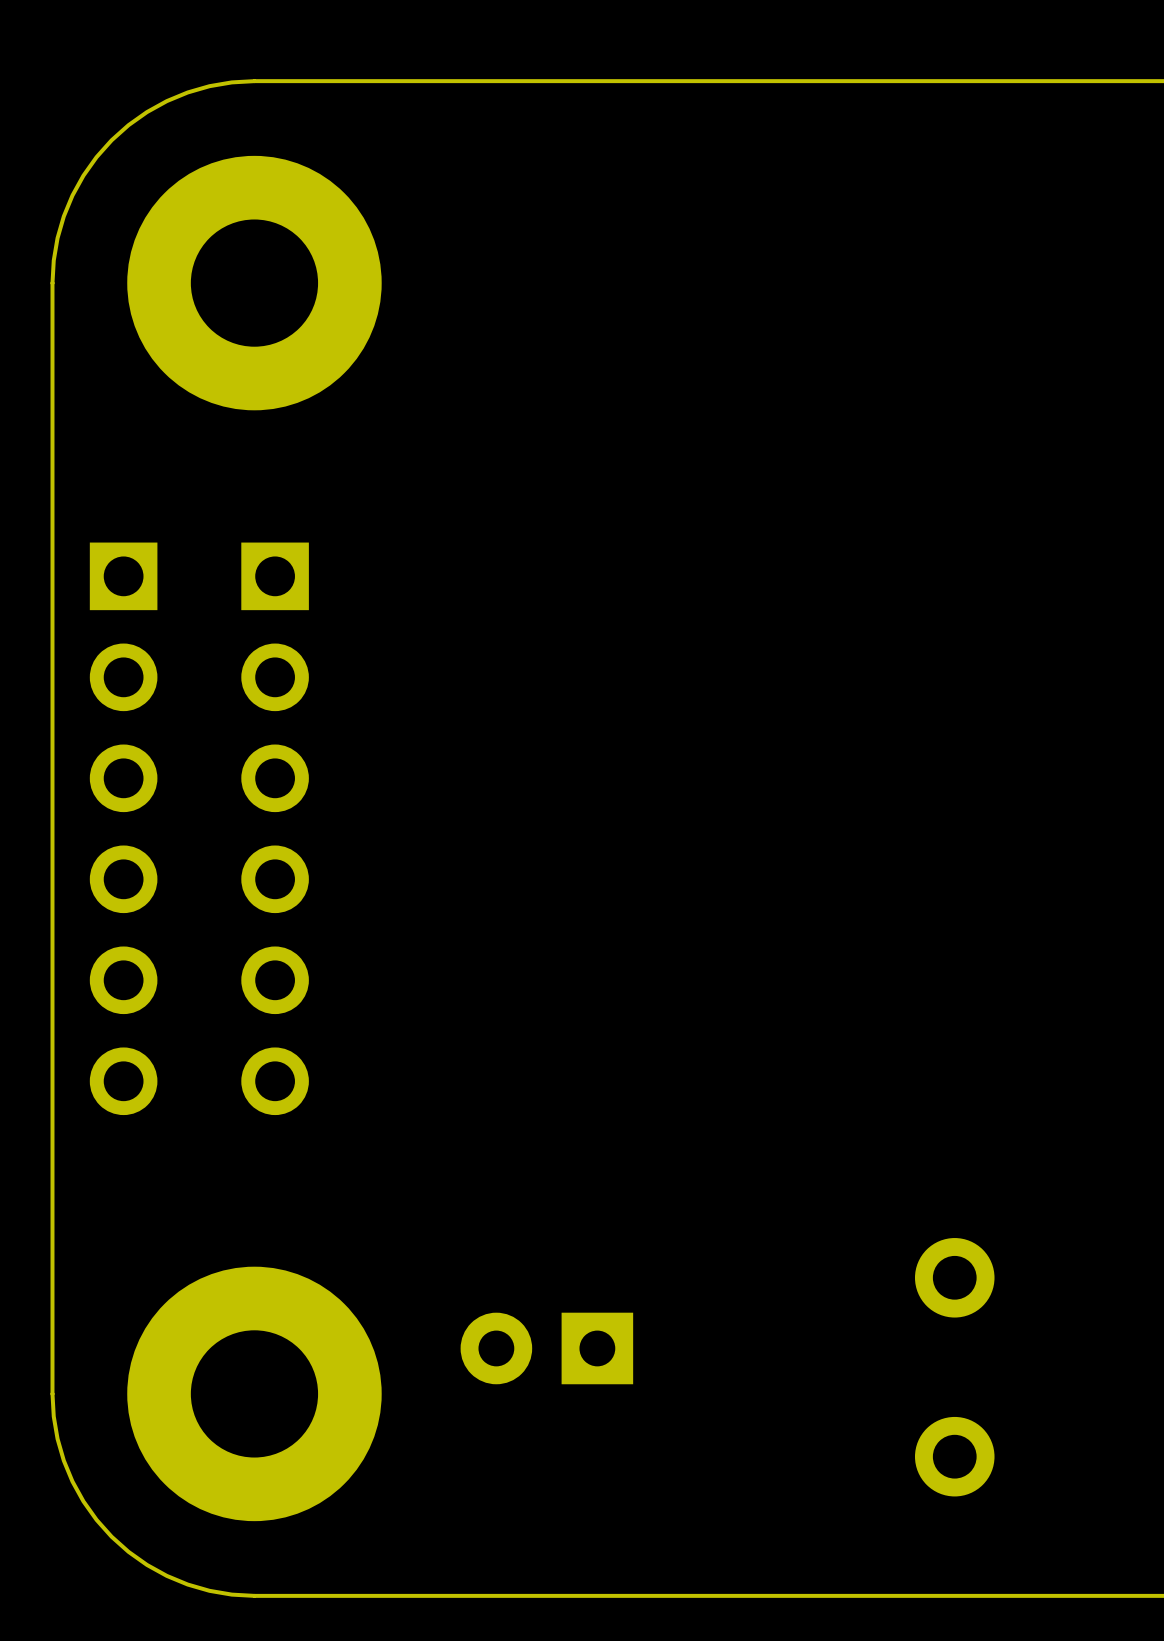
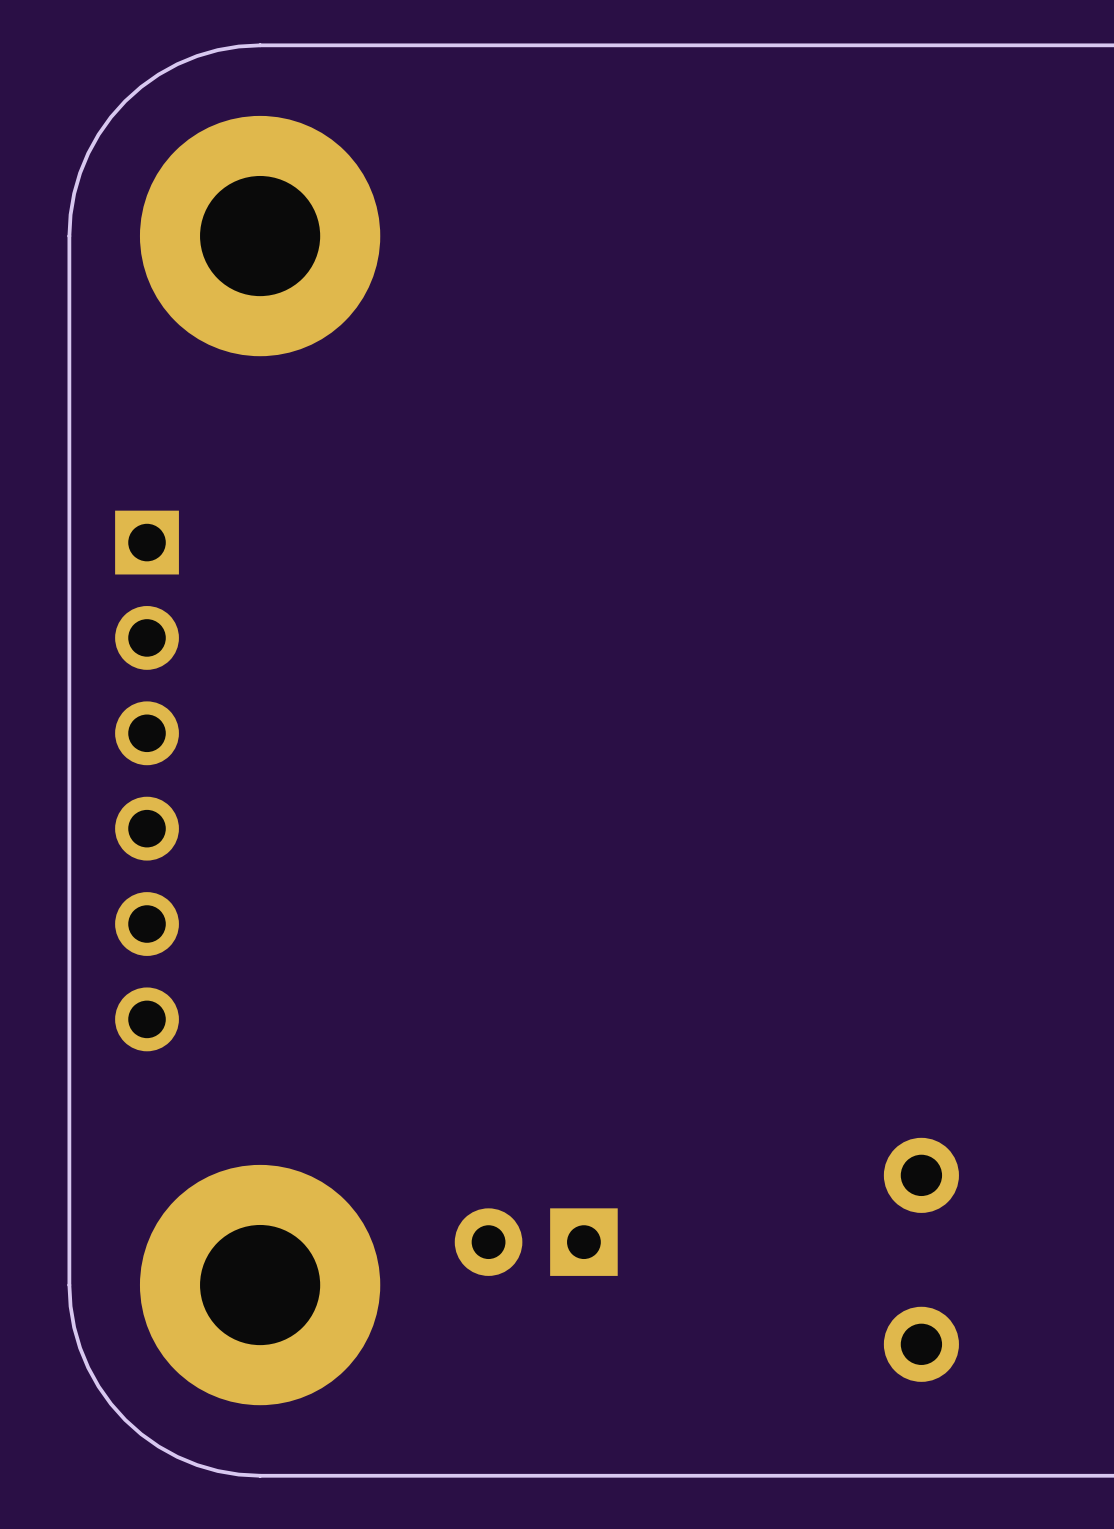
part position: (123, 828) -> (147, 780)
part: (275, 828) -> none

